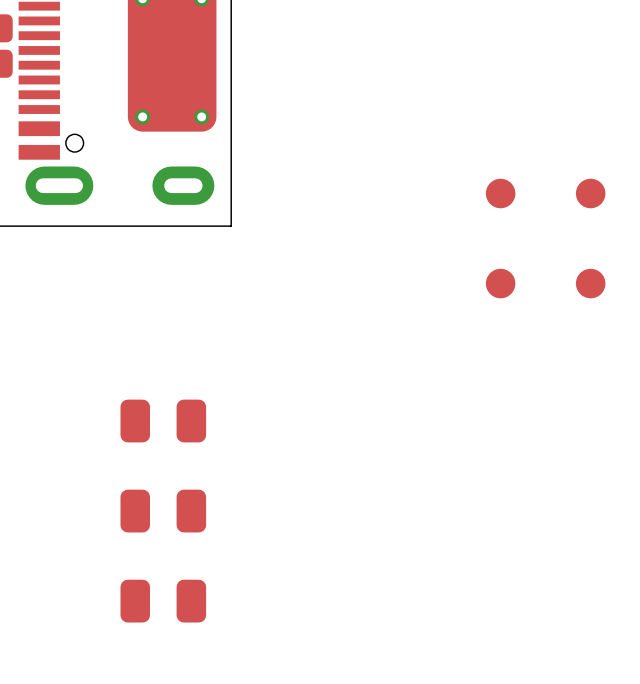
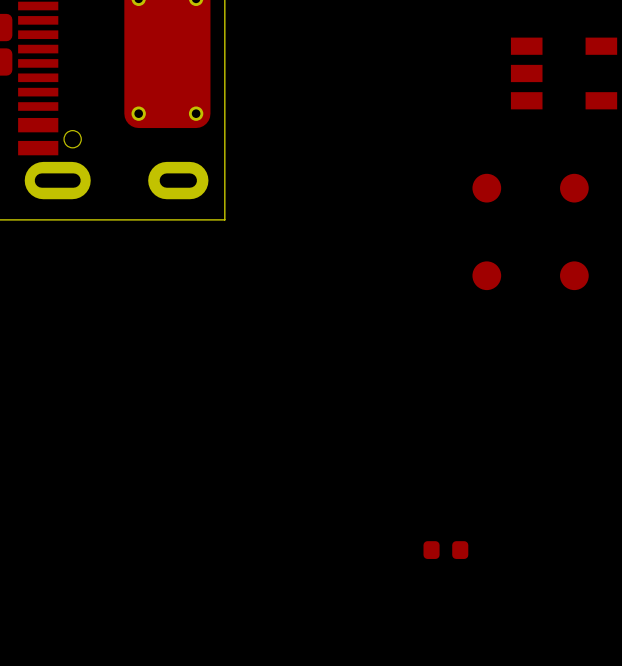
part: none -> (564, 73)
part: (163, 421) -> none
part: (163, 511) -> none
part: none -> (445, 550)
part: (163, 601) -> none

